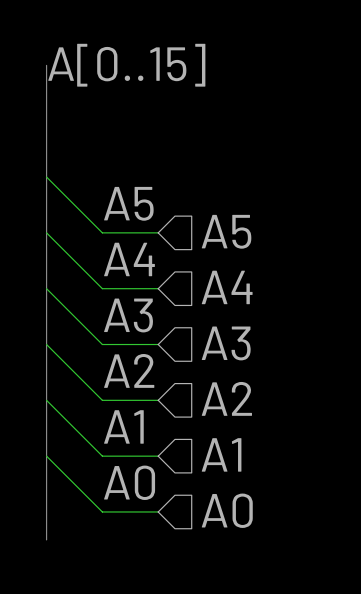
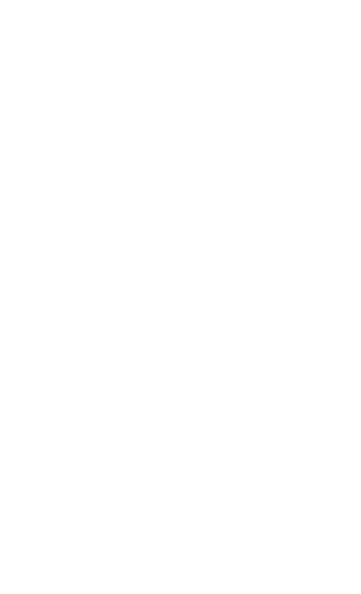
bus: (46, 65) (46, 539) -> none
label: A[0..15] (126, 65) -> none
wire: (46, 177) (102, 232) (158, 232) -> none
label: A5 (128, 203) -> none
hierarchical label: A5 (226, 231) -> none
wire: (46, 232) (102, 288) (158, 288) -> none
label: A4 (129, 259) -> none
hierarchical label: A4 (227, 287) -> none
wire: (46, 288) (102, 344) (158, 344) -> none
label: A3 (128, 315) -> none
hierarchical label: A3 (226, 343) -> none
wire: (46, 344) (102, 400) (158, 400) -> none
label: A2 (129, 370) -> none
hierarchical label: A2 (226, 398) -> none
wire: (46, 400) (102, 456) (158, 456) -> none
label: A1 (123, 426) -> none
hierarchical label: A1 (221, 454) -> none
wire: (46, 456) (102, 511) (158, 511) -> none
label: A0 (129, 482) -> none
hierarchical label: A0 (227, 510) -> none

